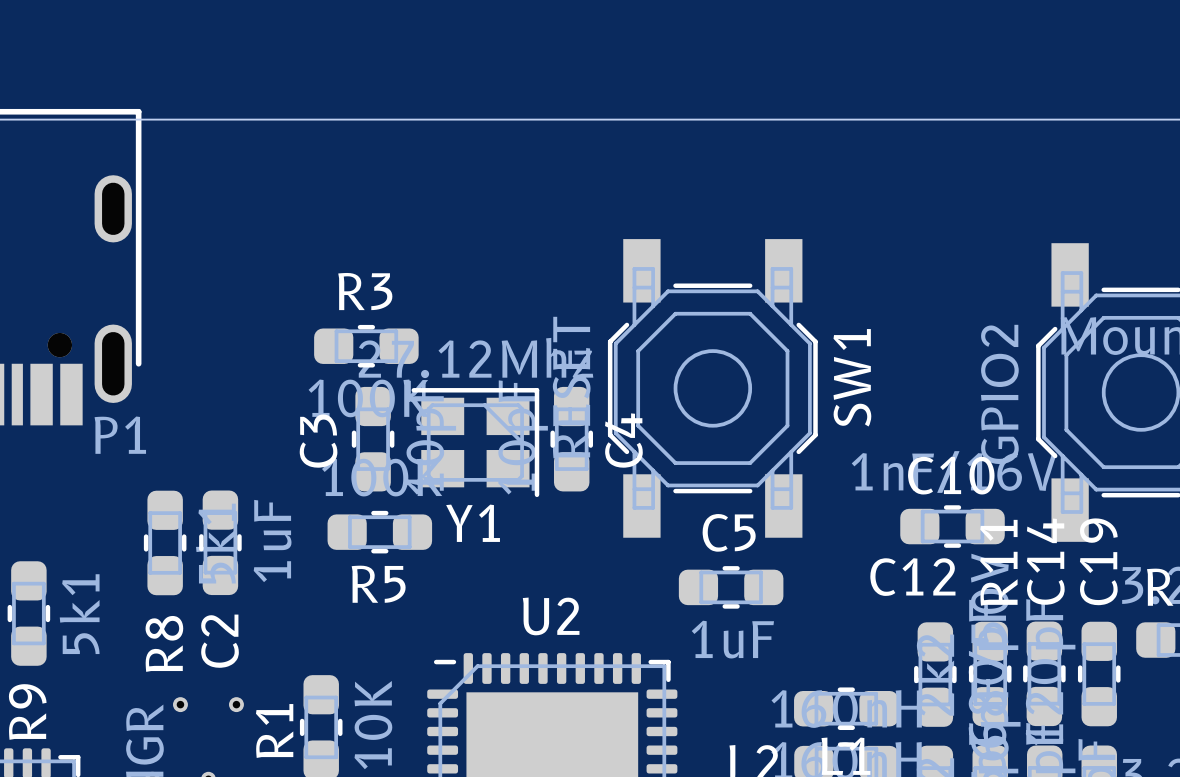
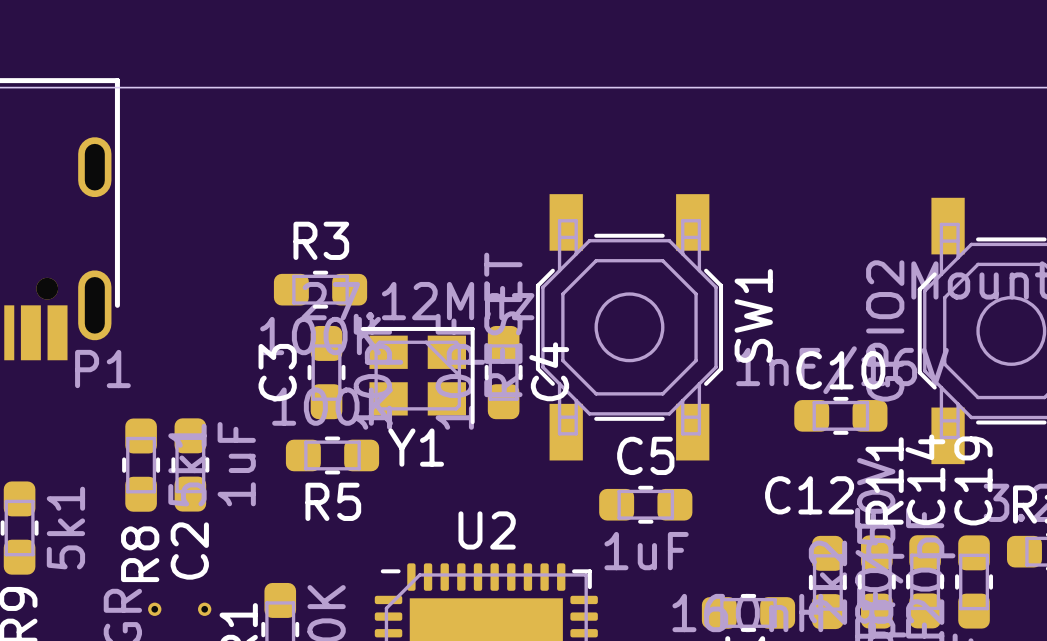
C10 position: (952, 526) -> (840, 415)

